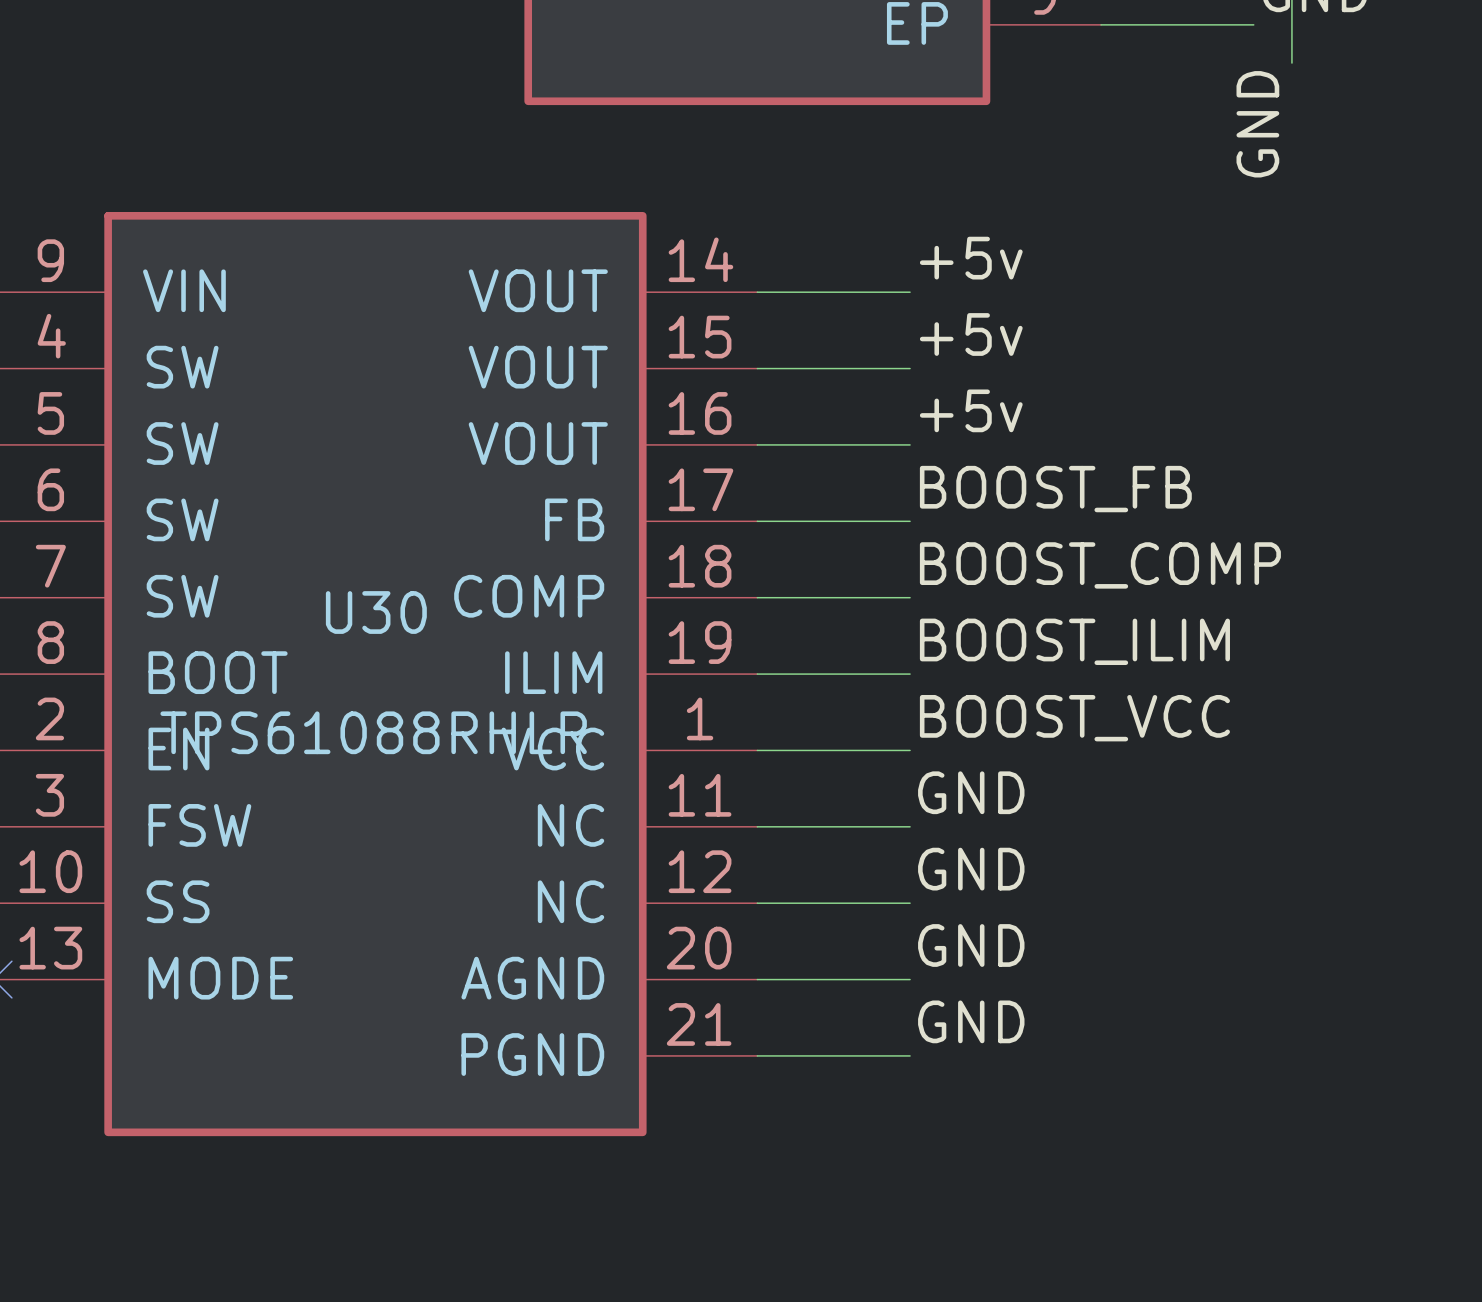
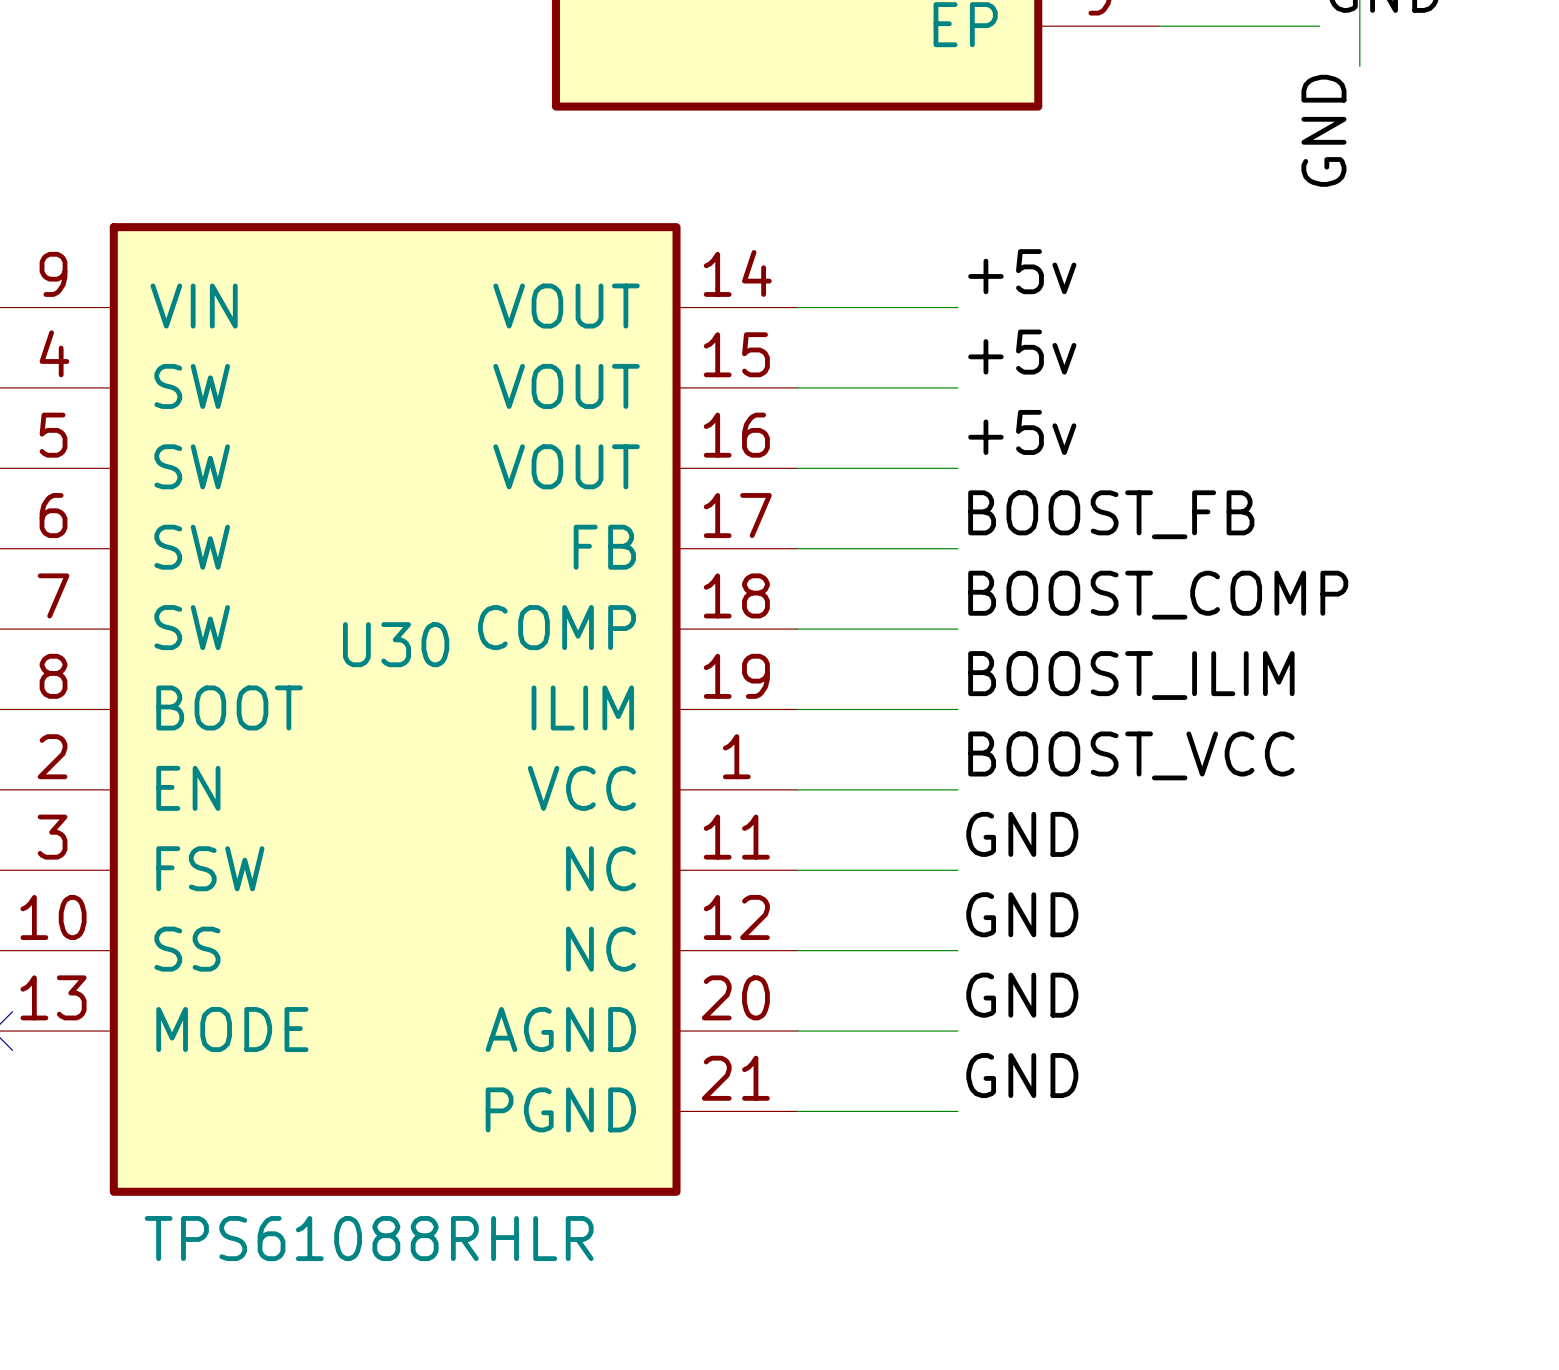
U30 value position: TPS61088RHLR (373, 732) -> TPS61088RHLR (369, 1238)

